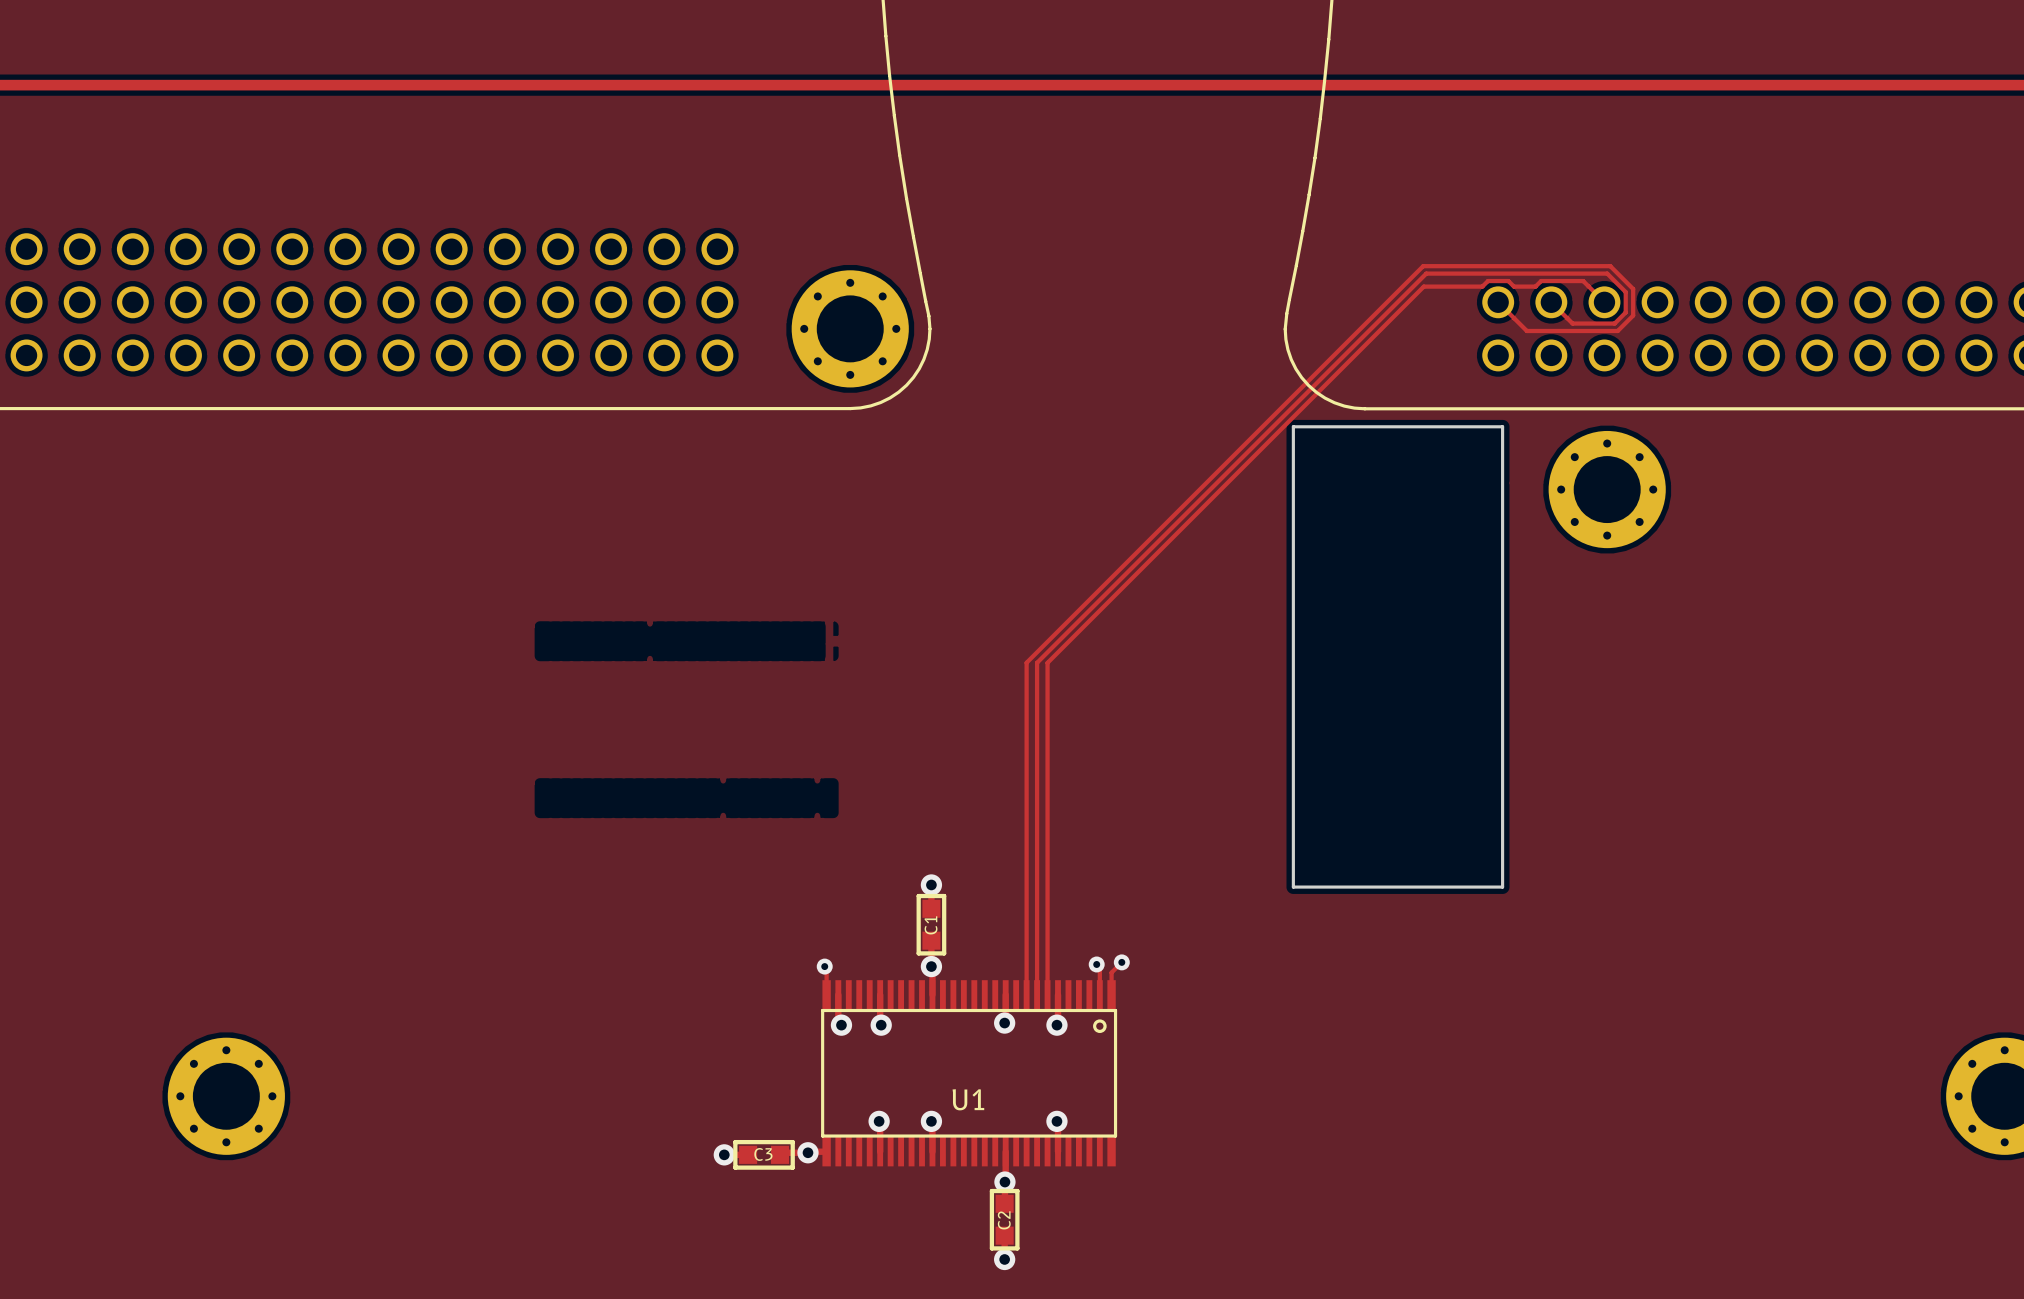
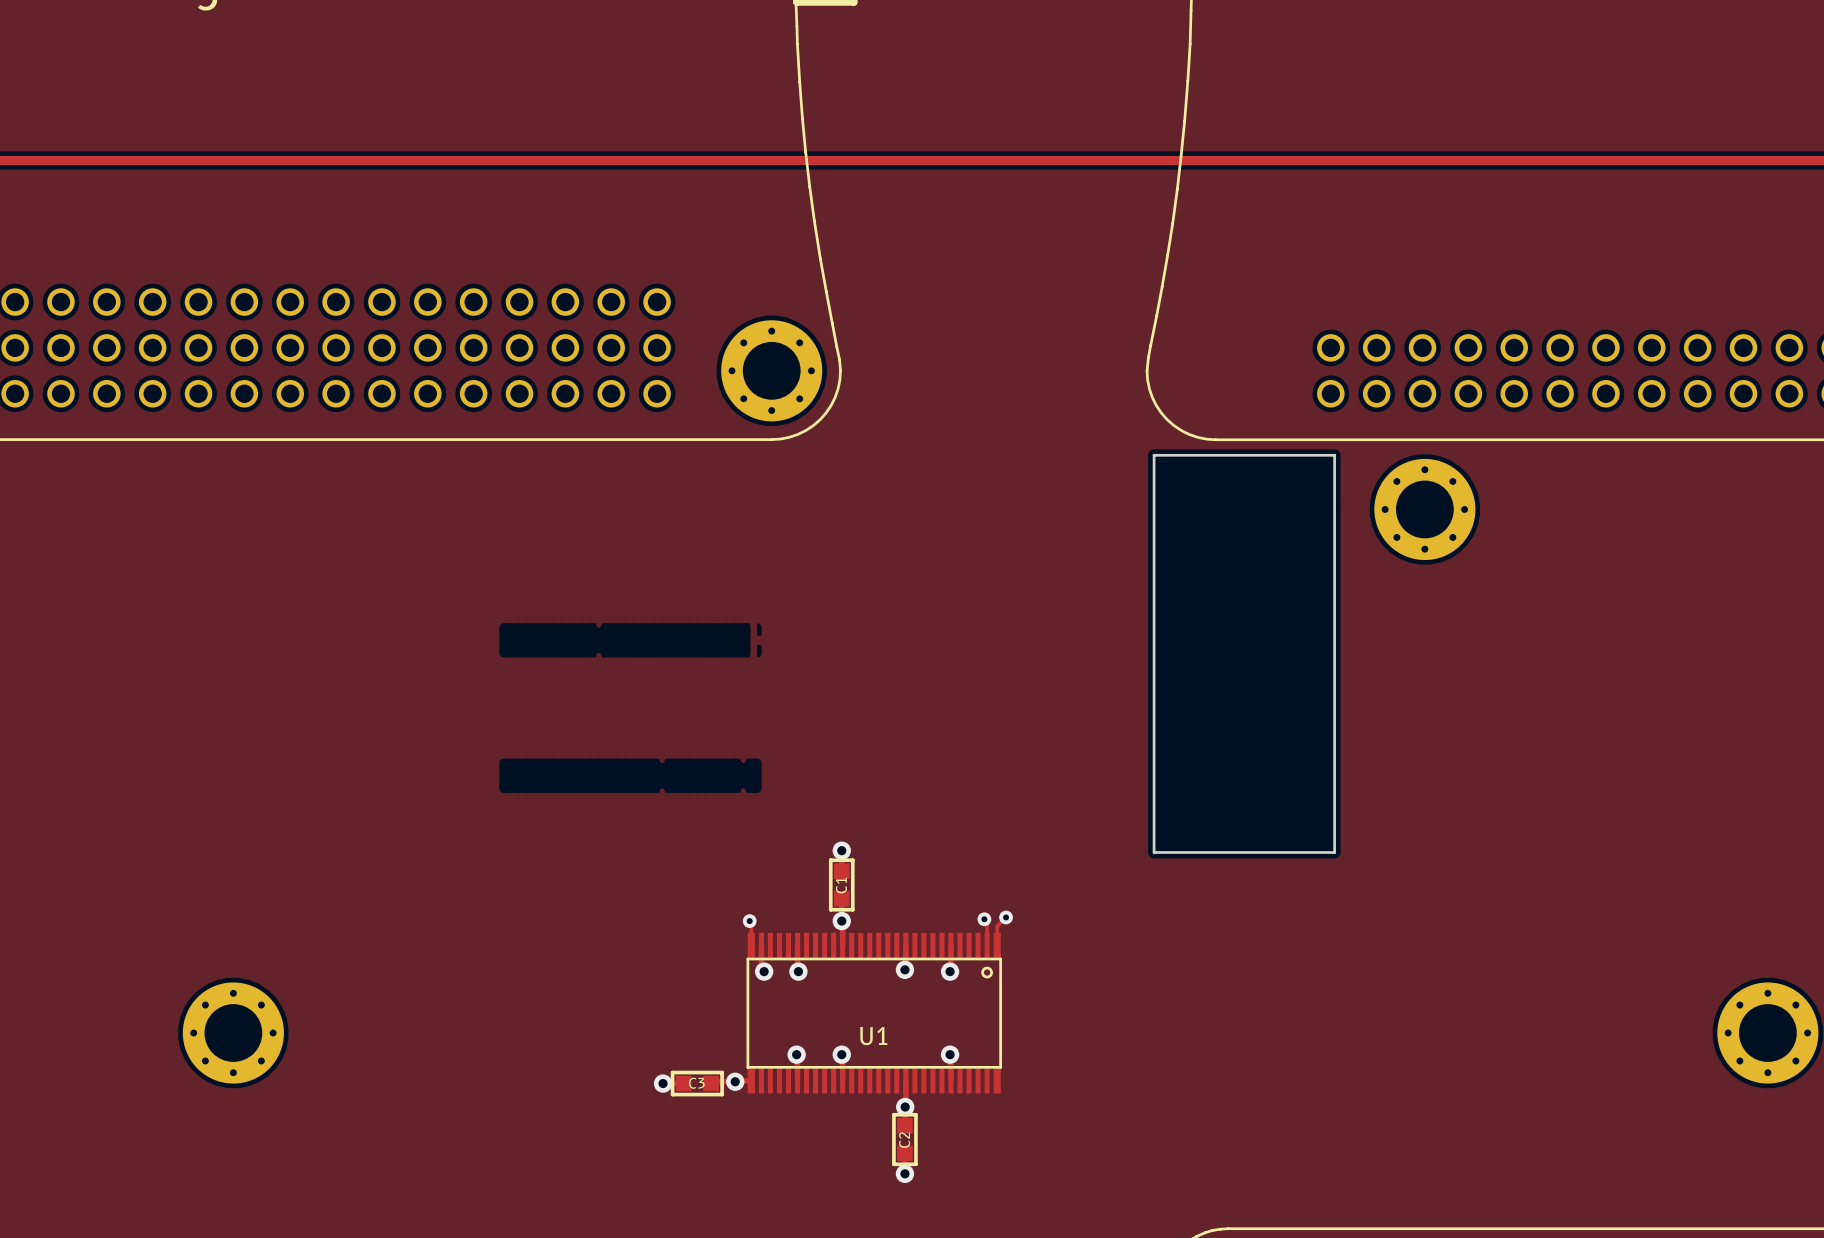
track: (1498, 302) (1526, 331) (1617, 331) (1633, 315) (1633, 289) (1610, 266) (1423, 266) (1026, 662) (1026, 994) -> none
track: (1551, 302) (1572, 323) (1614, 323) (1625, 312) (1625, 292) (1607, 273) (1426, 273) (1037, 662) (1037, 994) -> none
track: (1604, 302) (1583, 281) (1541, 281) (1535, 286) (1513, 286) (1508, 281) (1487, 281) (1482, 286) (1423, 286) (1047, 662) (1047, 994) -> none

